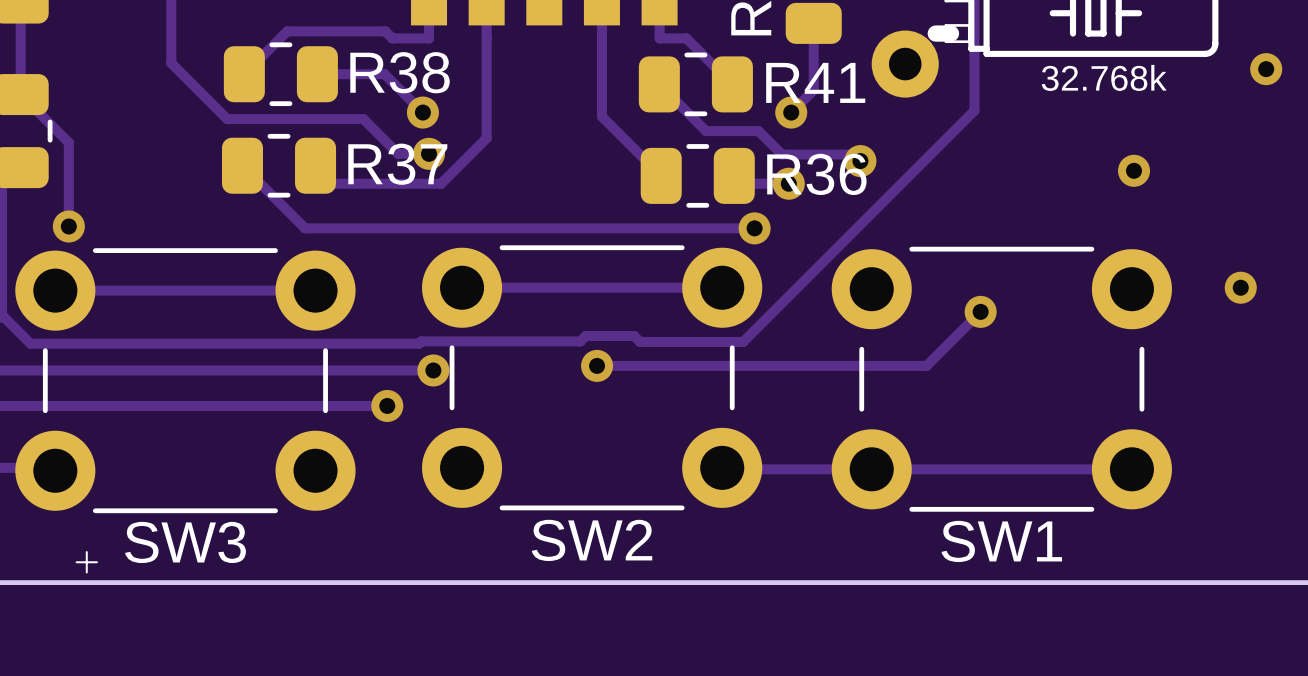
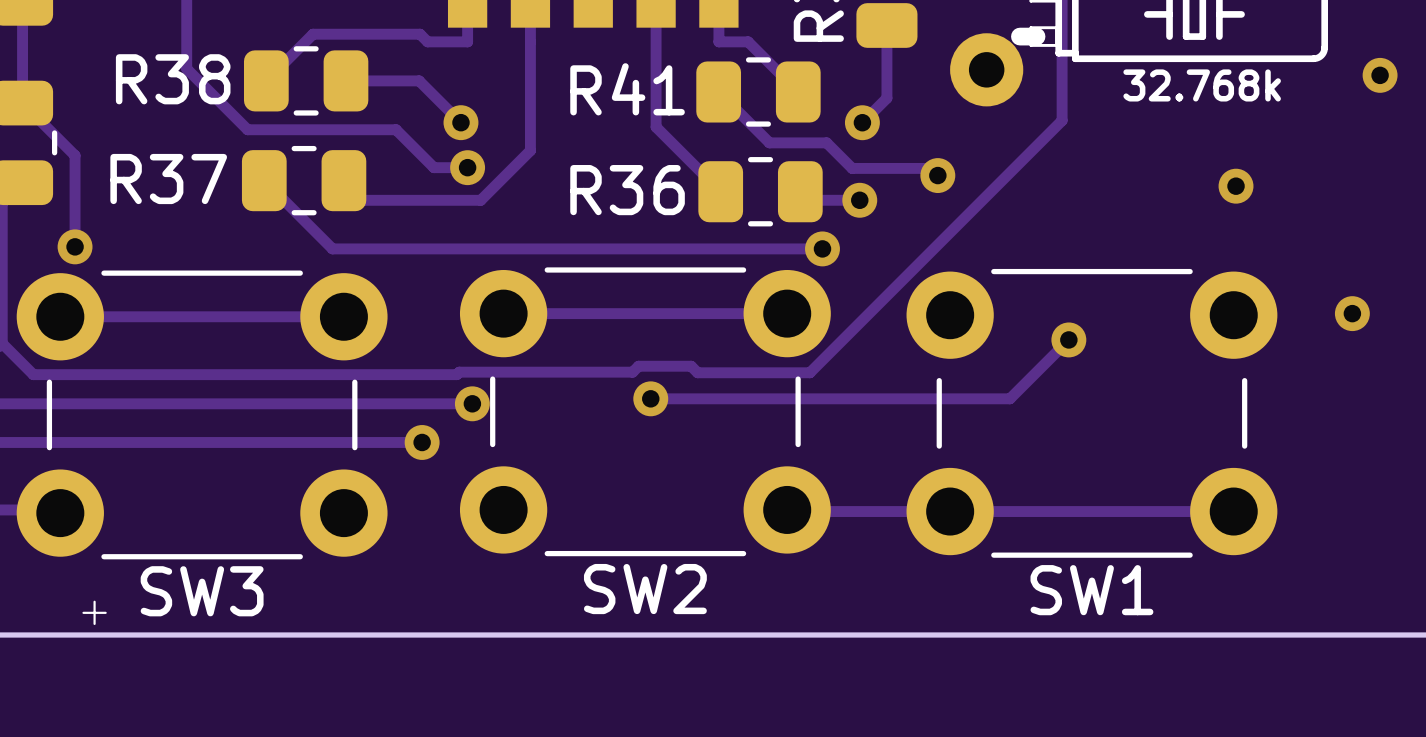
R38 name position: R38 (400, 72) -> R38 (173, 79)
R41 name position: R41 (815, 82) -> R41 (627, 89)
R37 name position: R37 (397, 164) -> R37 (168, 179)
R36 name position: R36 (816, 174) -> R36 (627, 190)

